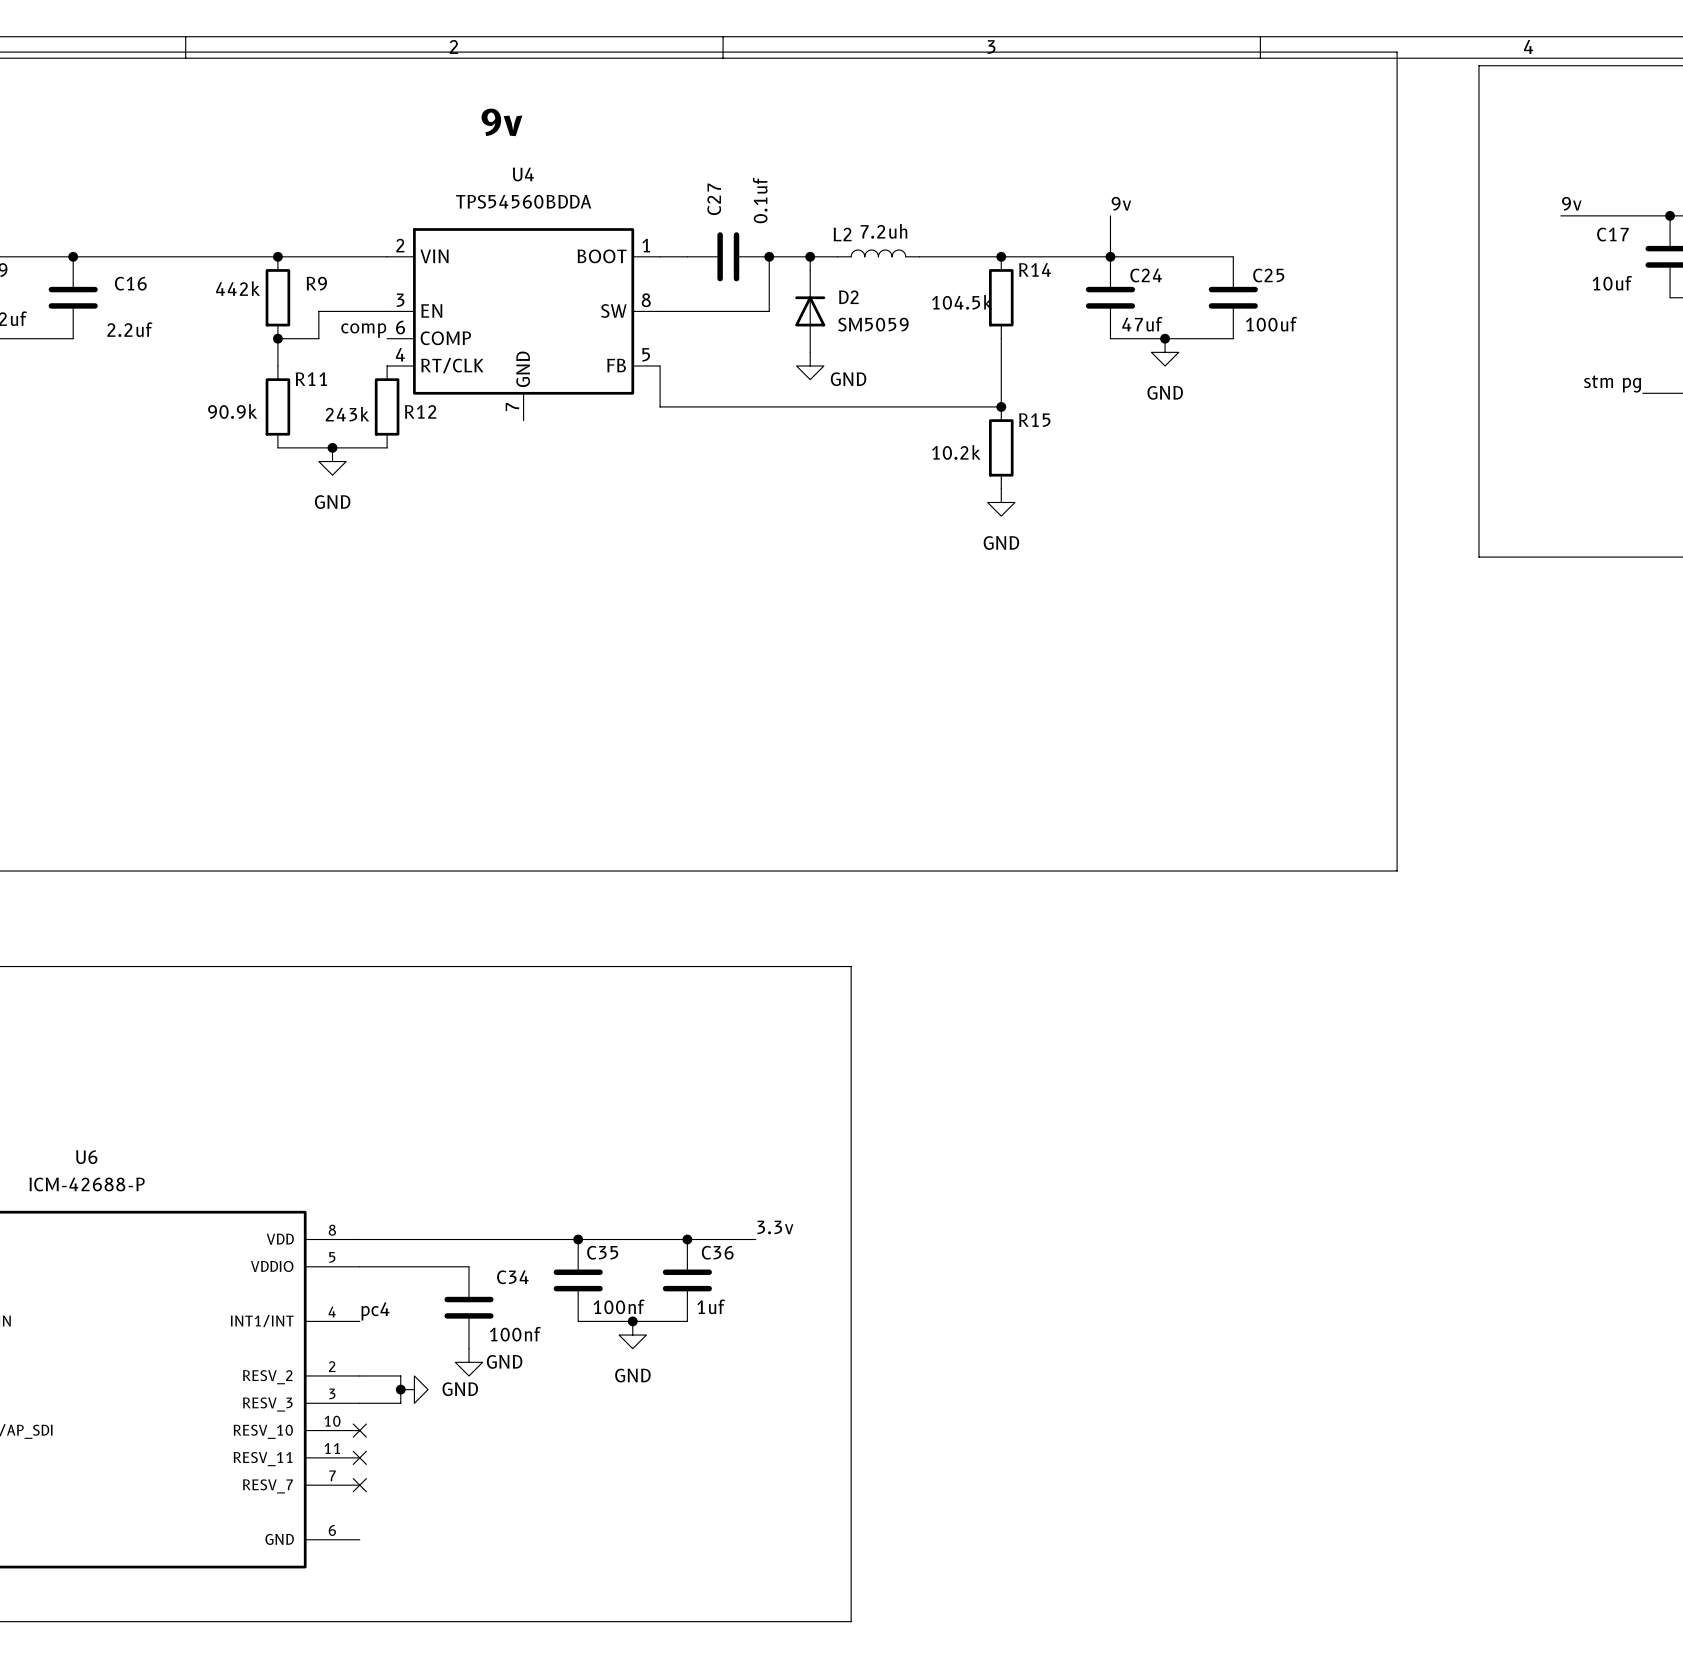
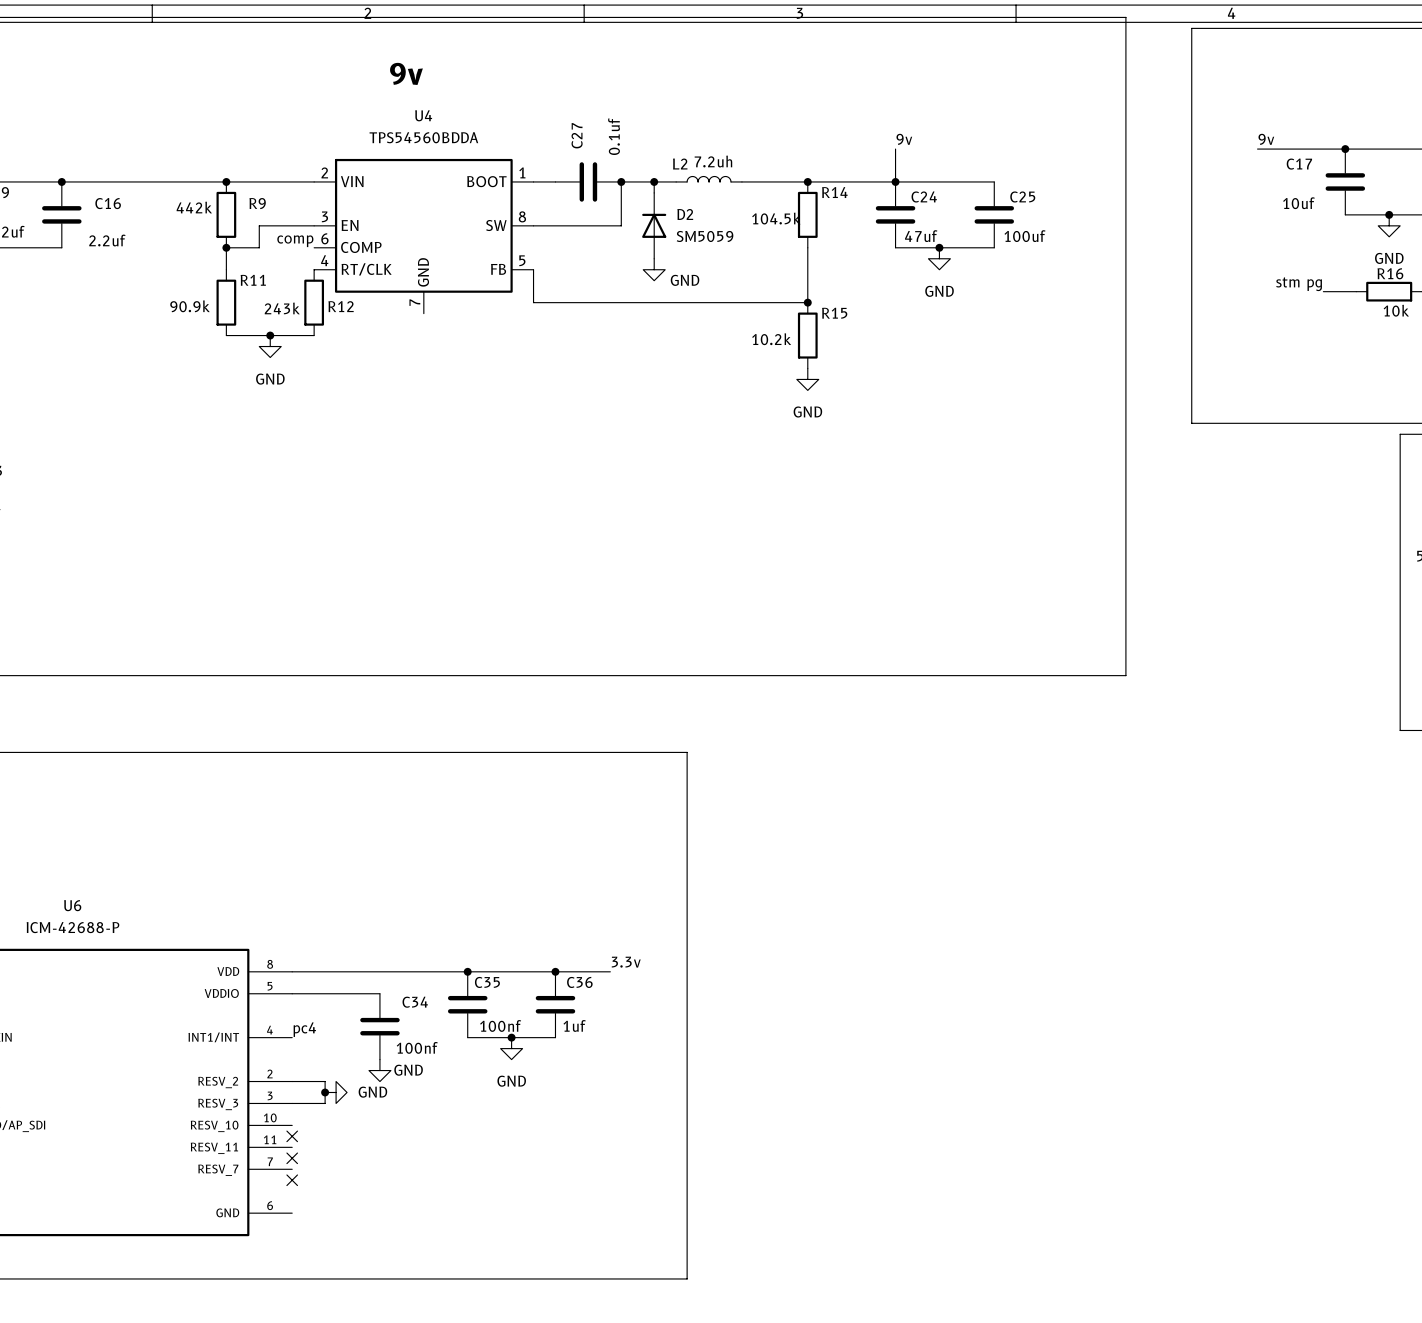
no-connect mark: (359, 1430) -> none
no-connect mark: none -> (292, 1136)
no-connect mark: (359, 1457) -> none
no-connect mark: none -> (292, 1158)
no-connect mark: (359, 1485) -> none
no-connect mark: none -> (292, 1180)

